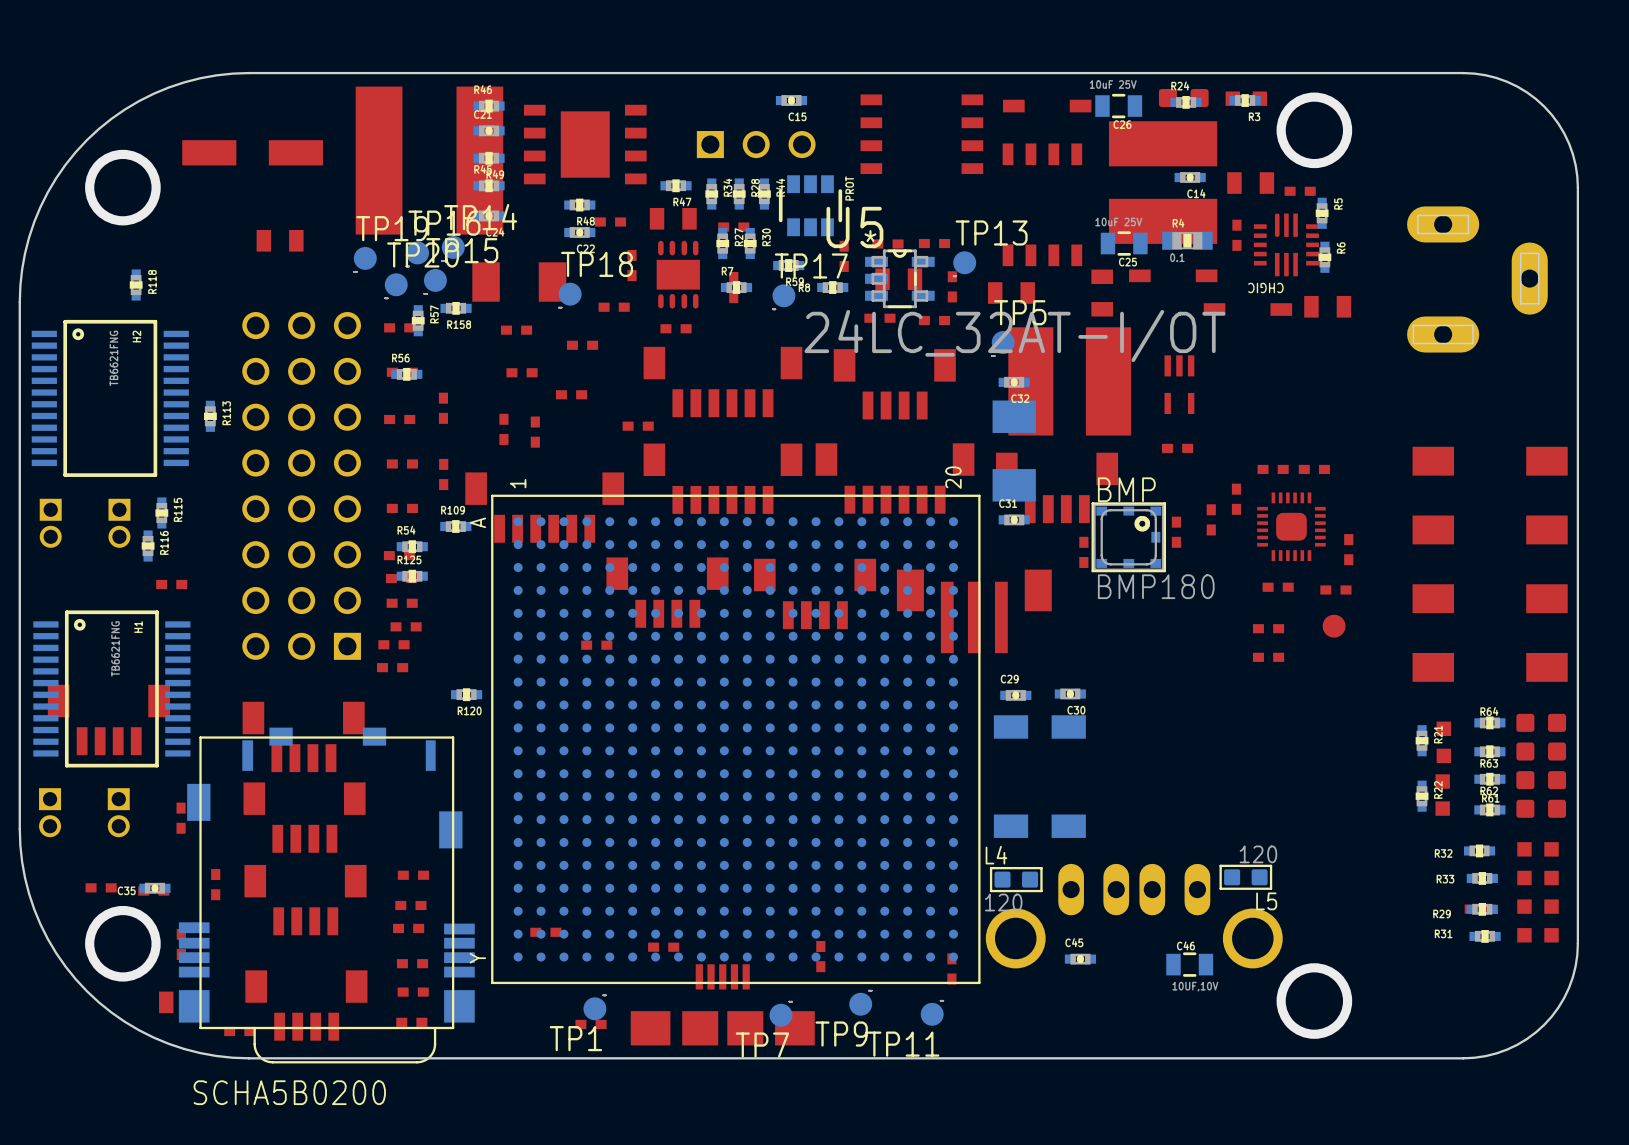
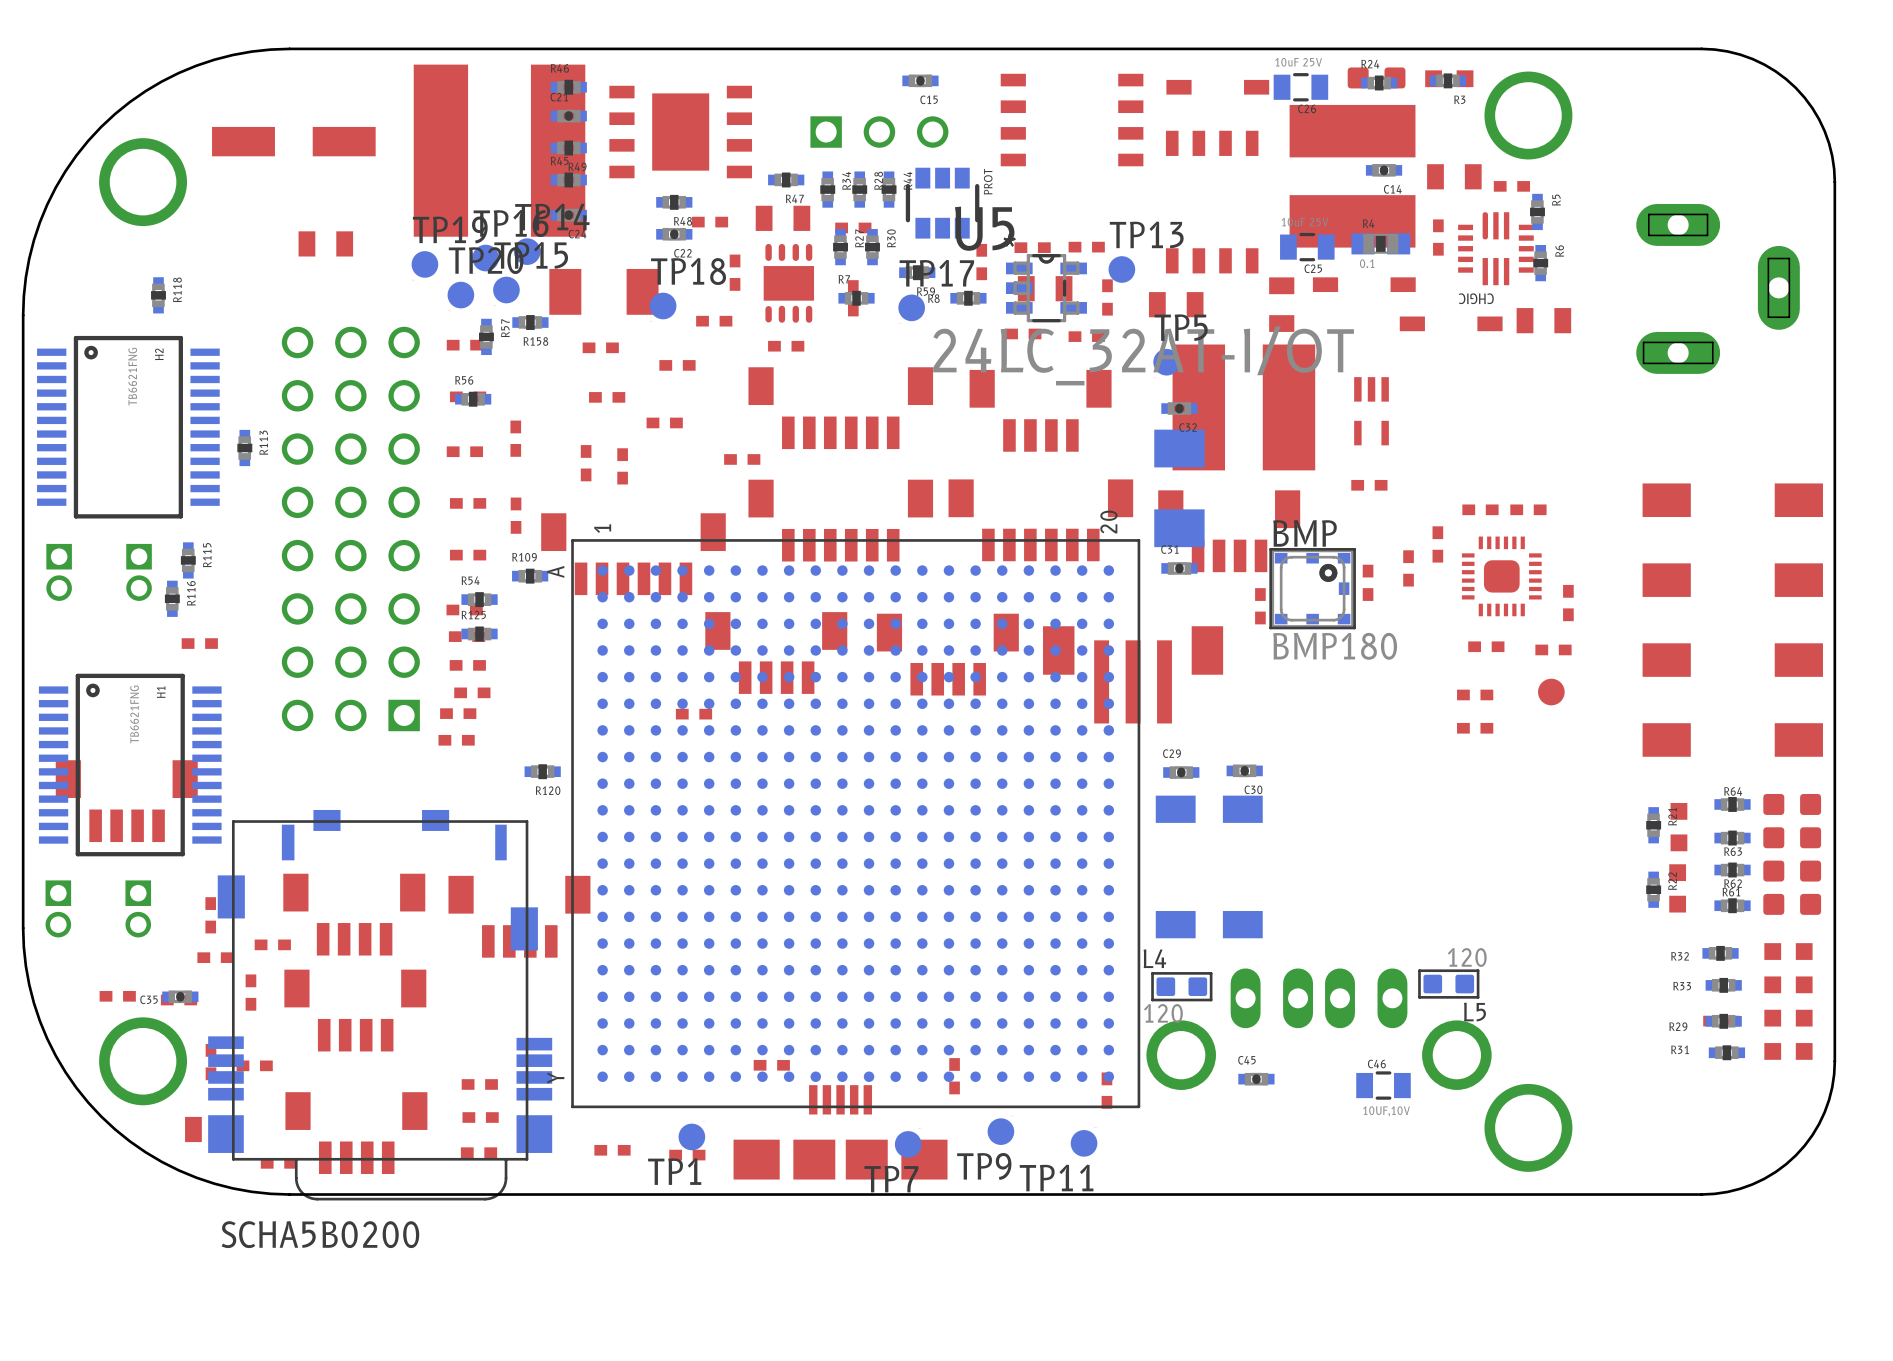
part position: (303, 736) -> (519, 916)
part: none -> (272, 944)
part: none -> (215, 957)
part: (413, 875) -> none
part: (410, 905) -> none
part: (408, 928) -> none
part: (545, 932) -> none
part: none -> (254, 1065)
part: none -> (612, 1150)

